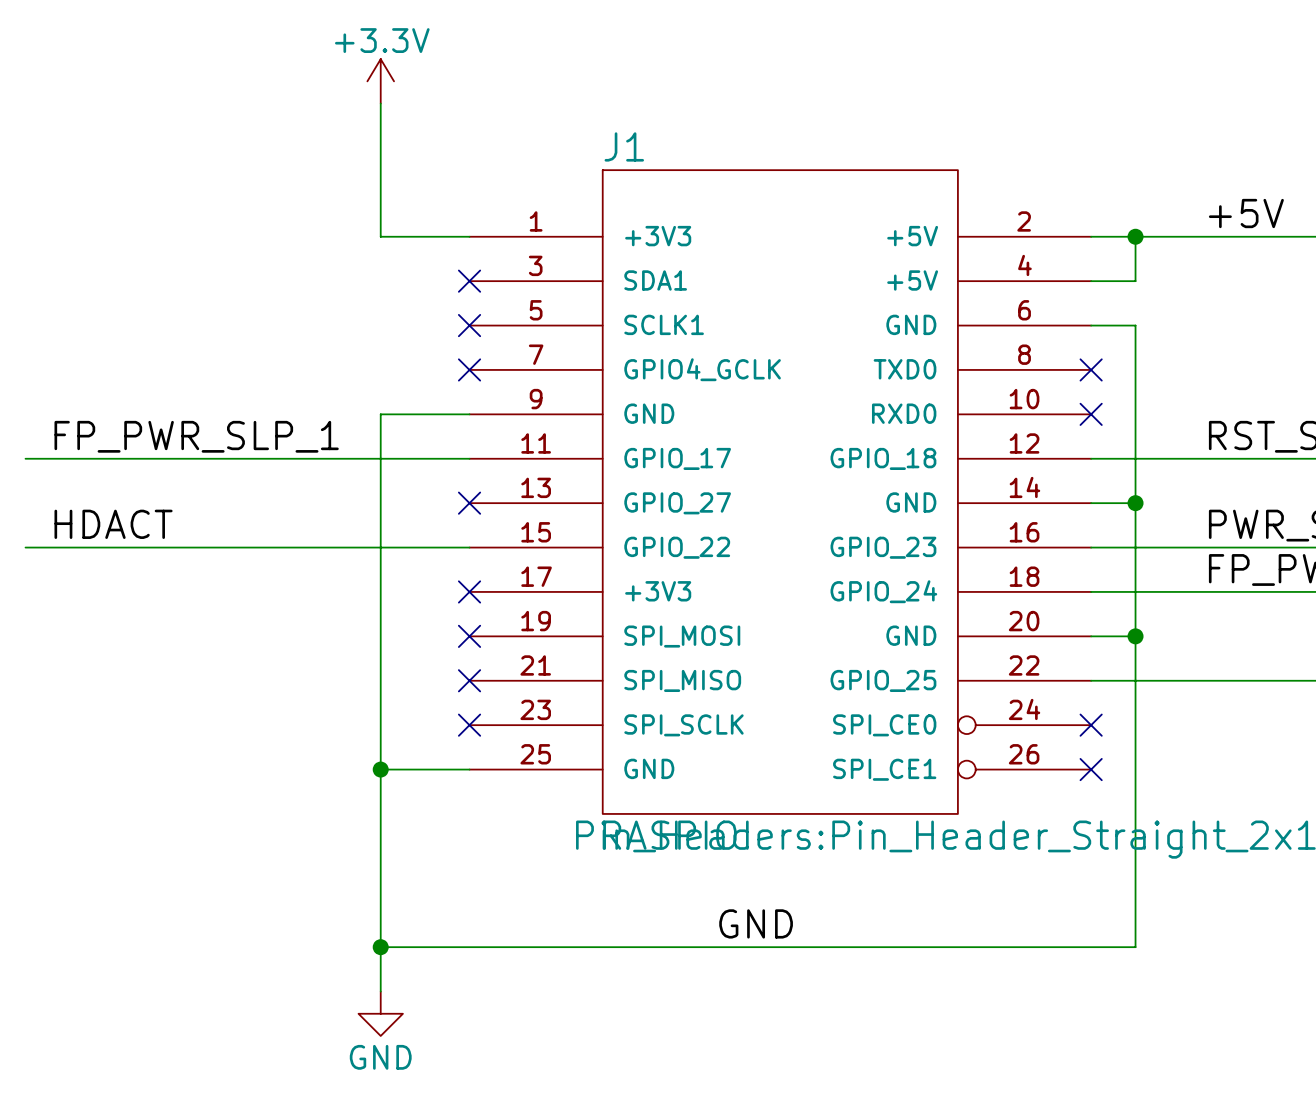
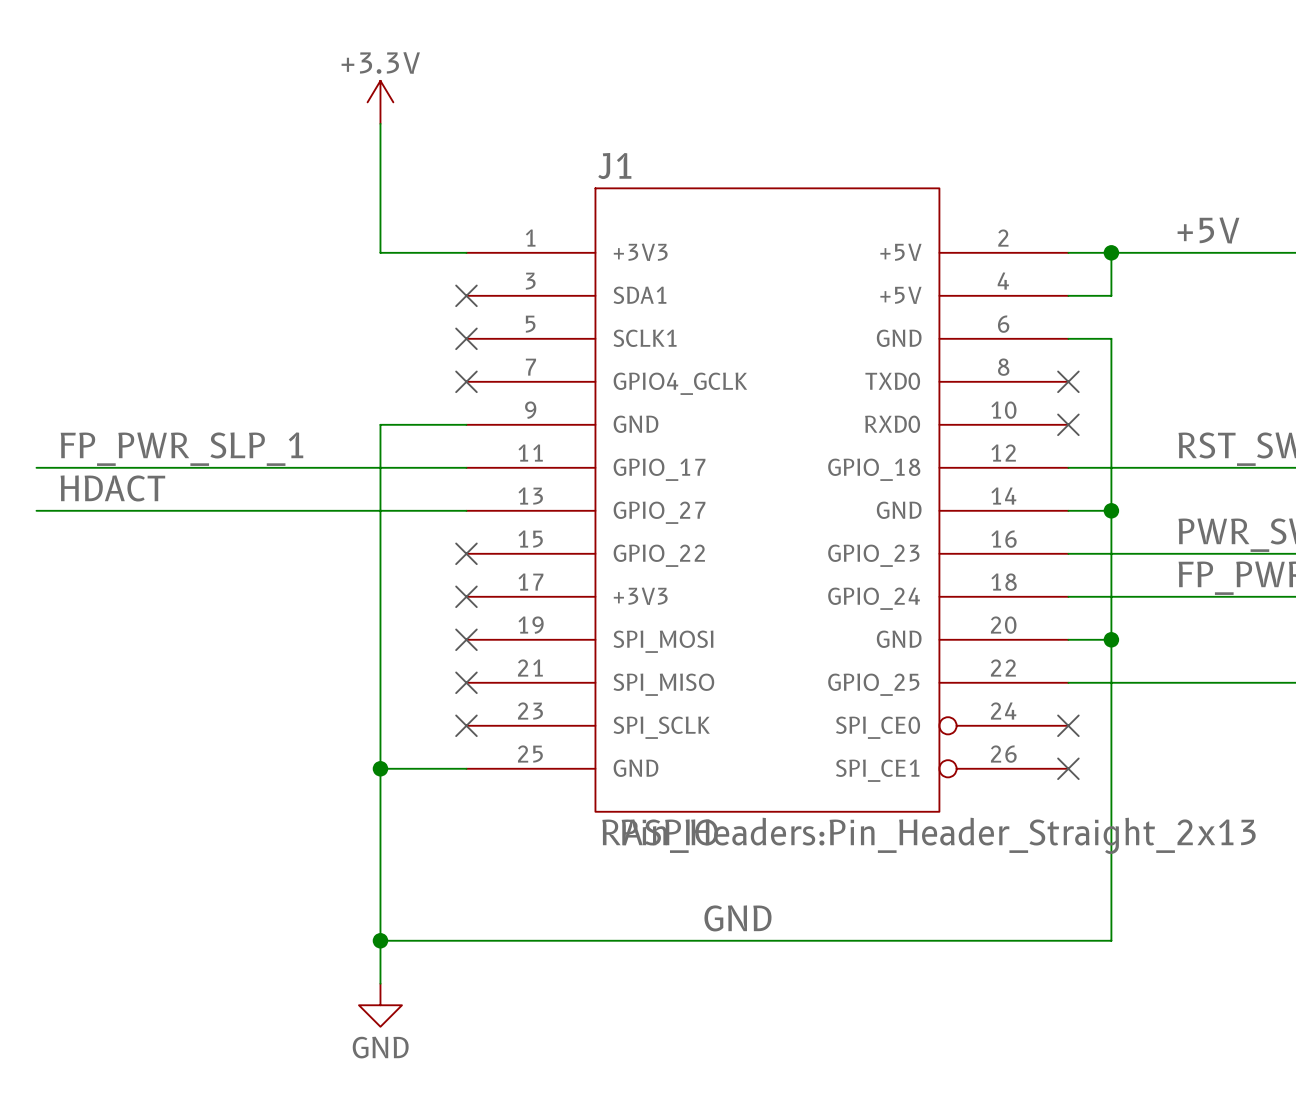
no-connect mark position: (469, 503) -> (466, 553)
label position: HDACT (113, 524) -> HDACT (112, 488)
wire: (25, 547) (469, 547) -> (36, 510) (466, 510)

